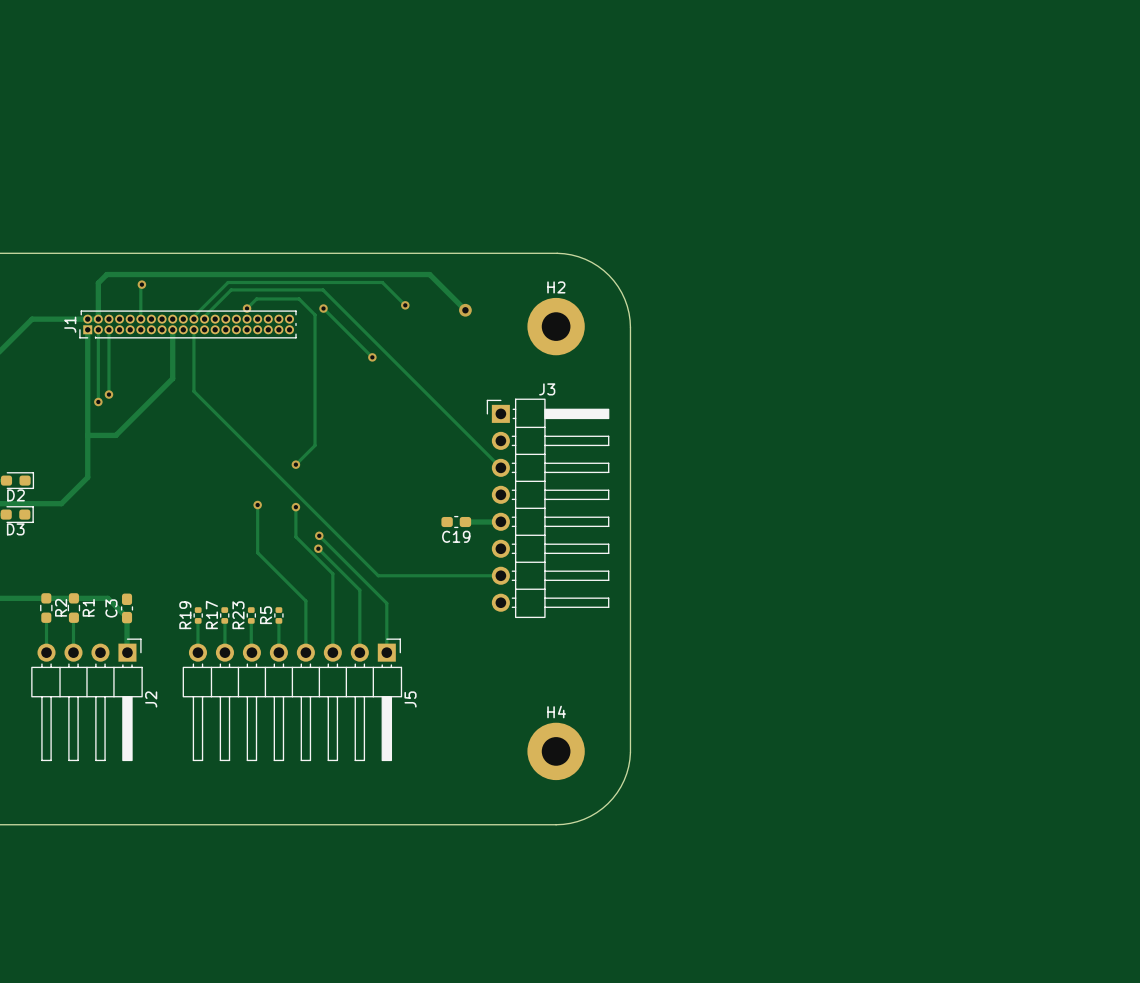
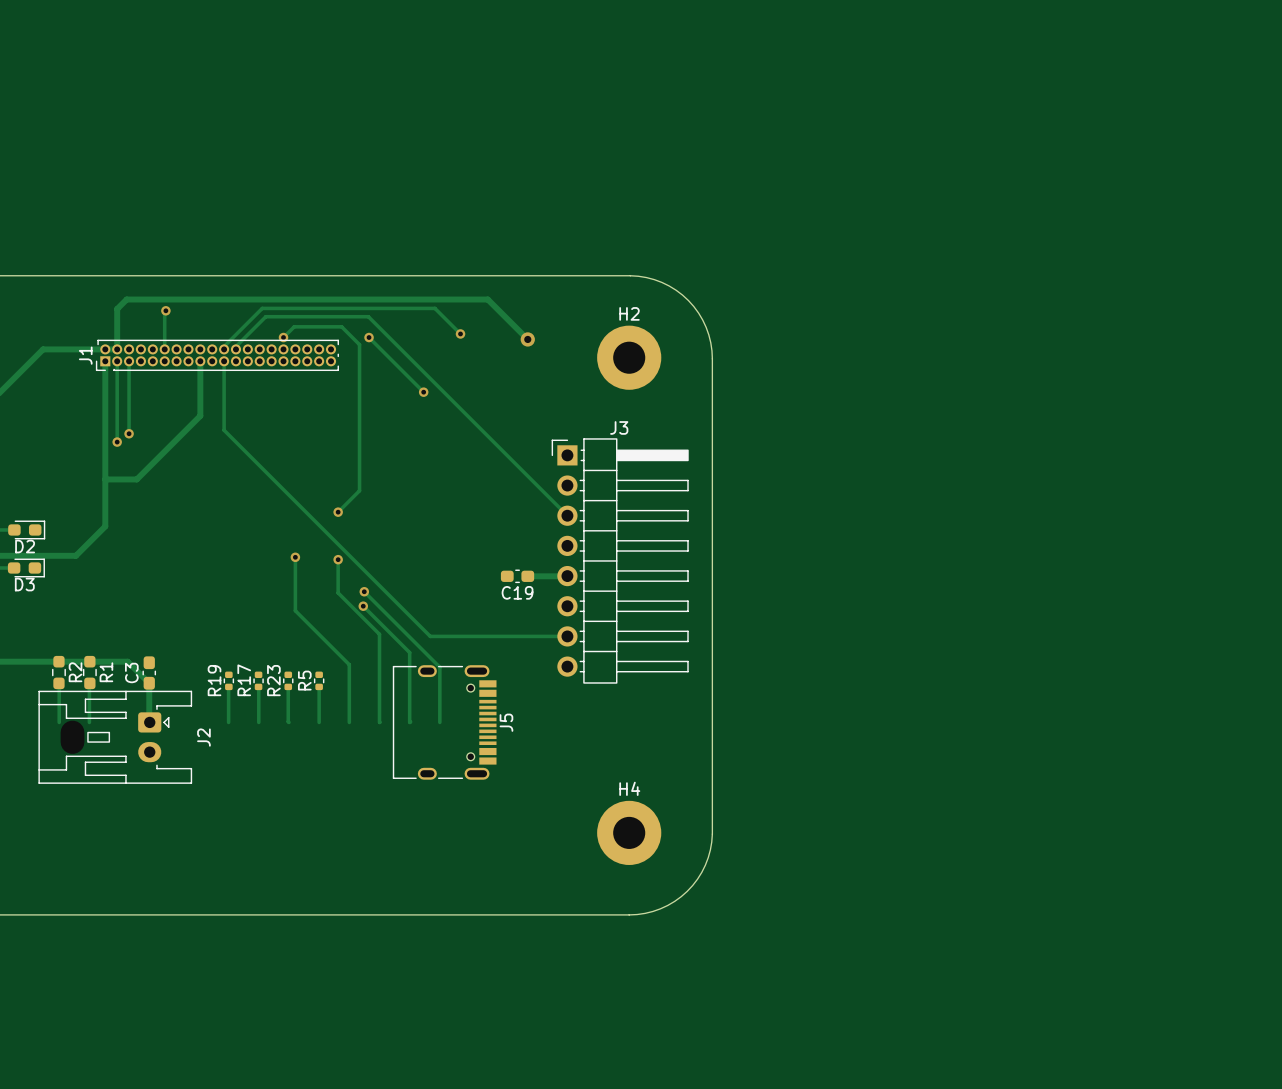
J2 footprint: [31, 638, 143, 762] -> [38, 690, 193, 784]
J5 footprint: [182, 638, 403, 762] -> [392, 665, 497, 780]
J5 name position: J5 (410, 699) -> J5 (506, 722)

